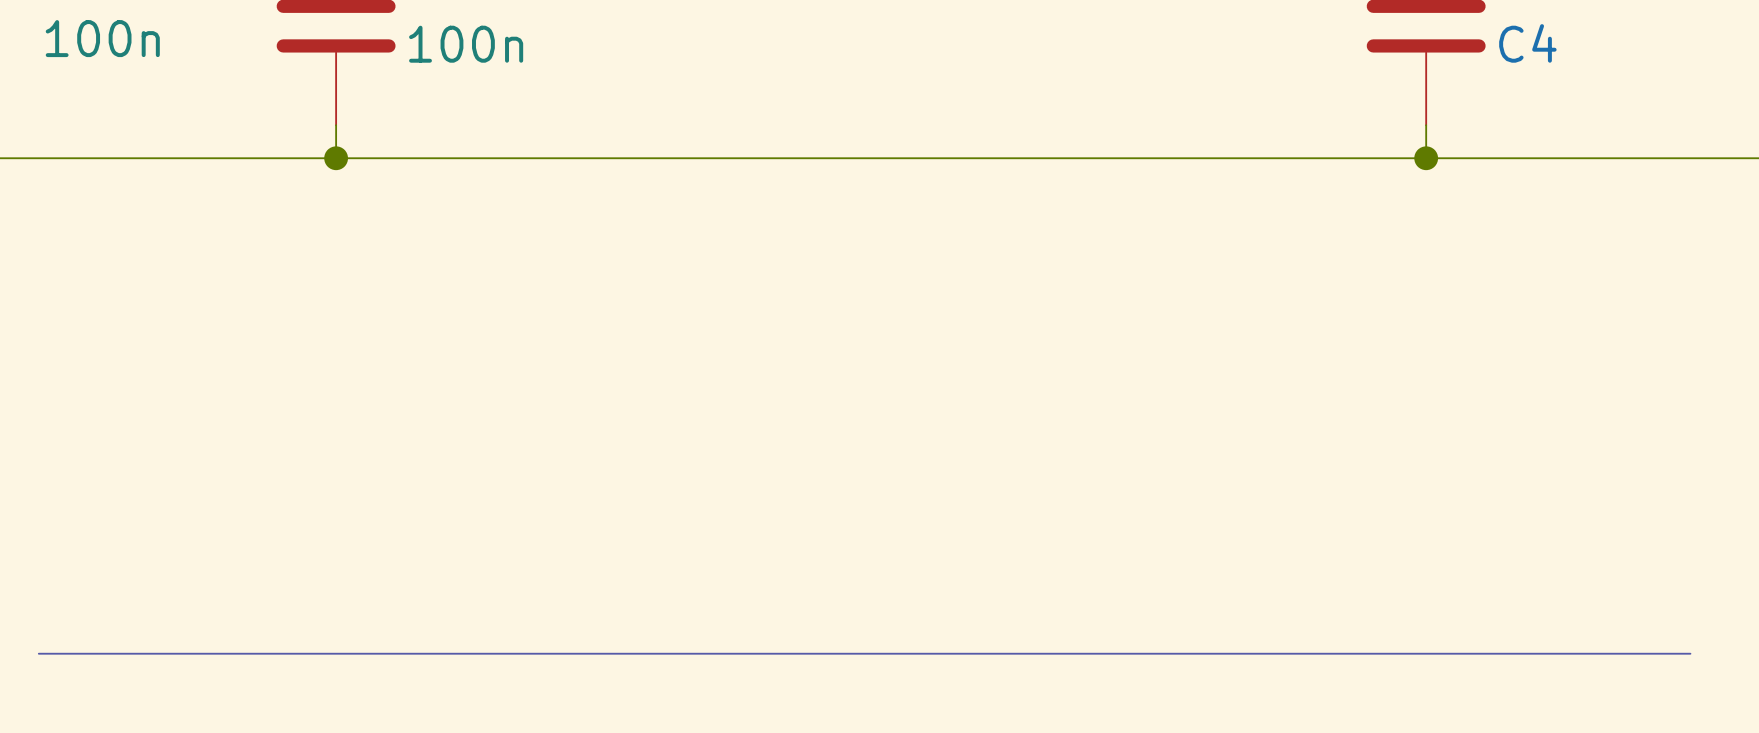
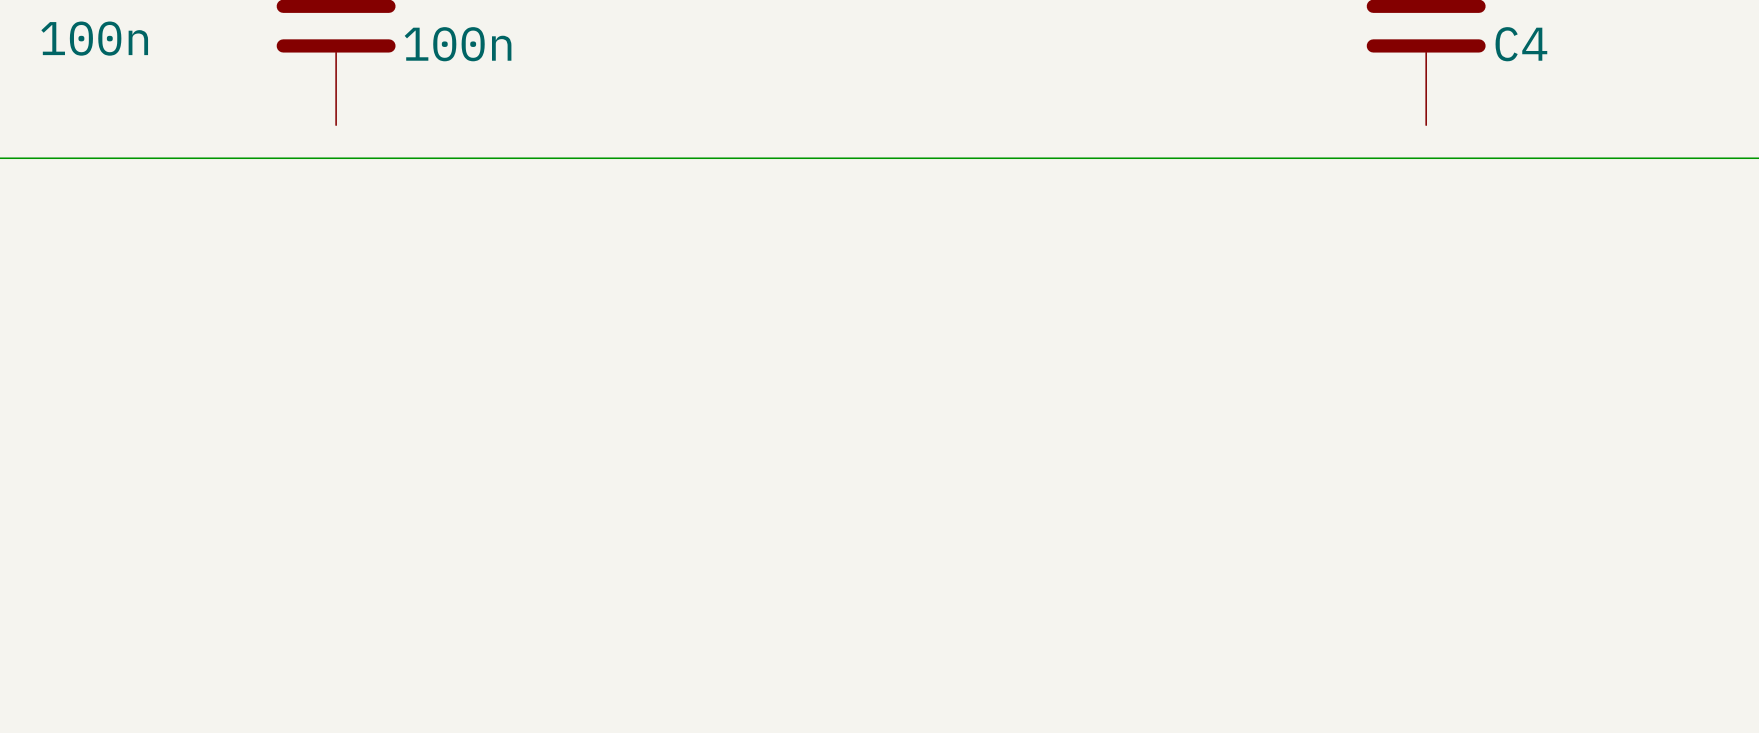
wire: (336, 125) (336, 158) -> none
wire: (1426, 125) (1426, 158) -> none
junction: (336, 158) -> none
junction: (1426, 158) -> none
line: (38, 653) (1690, 653) -> none

